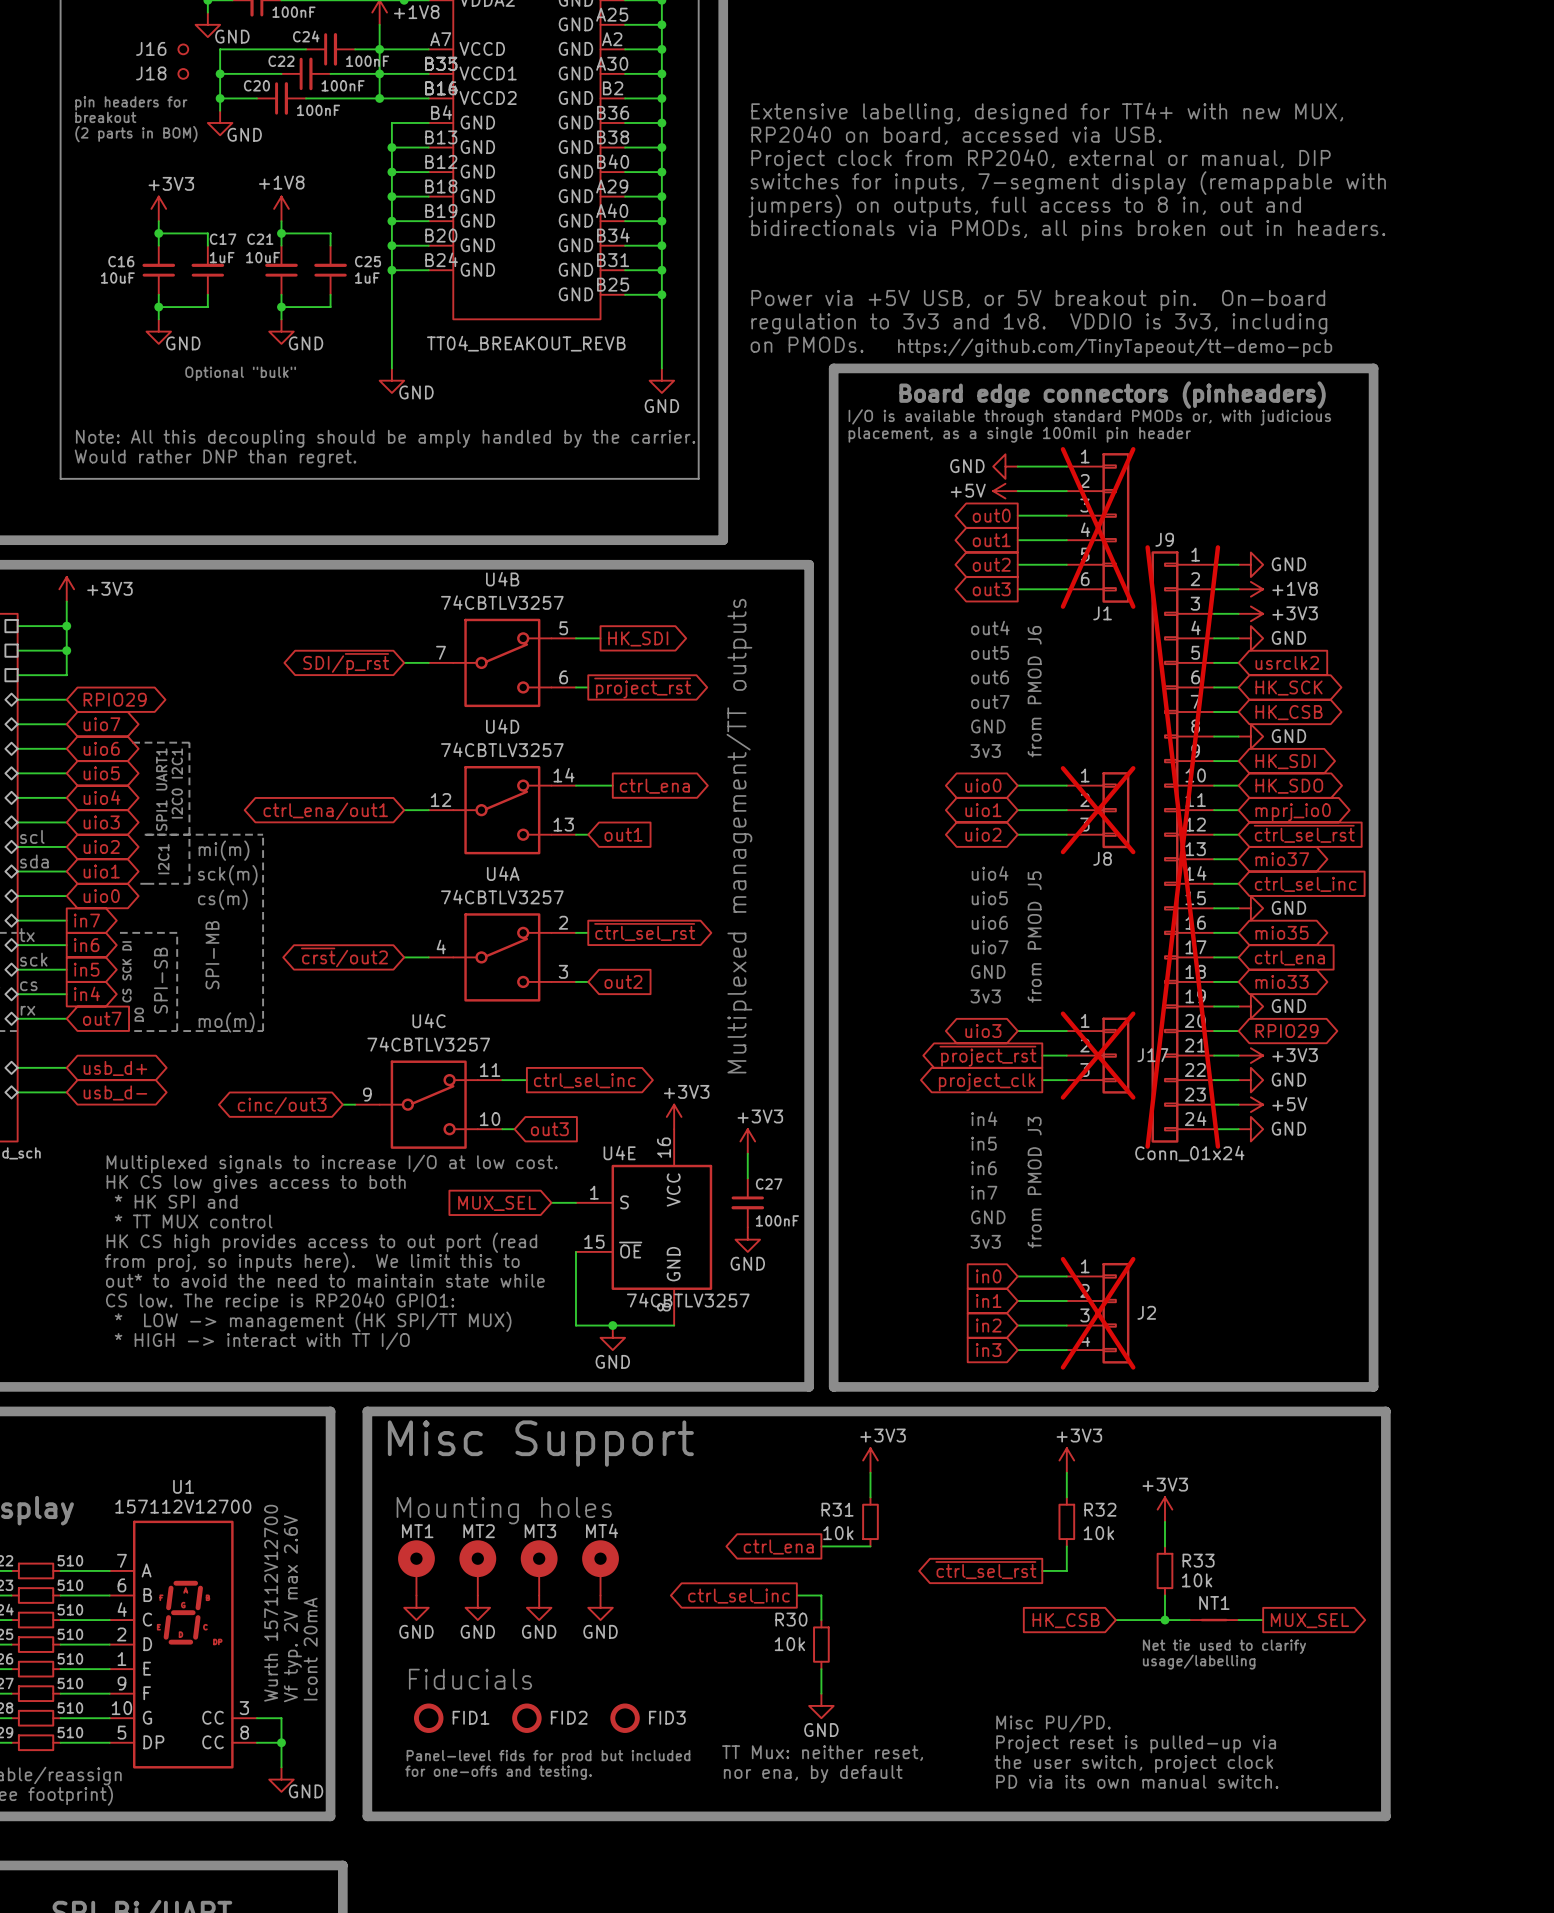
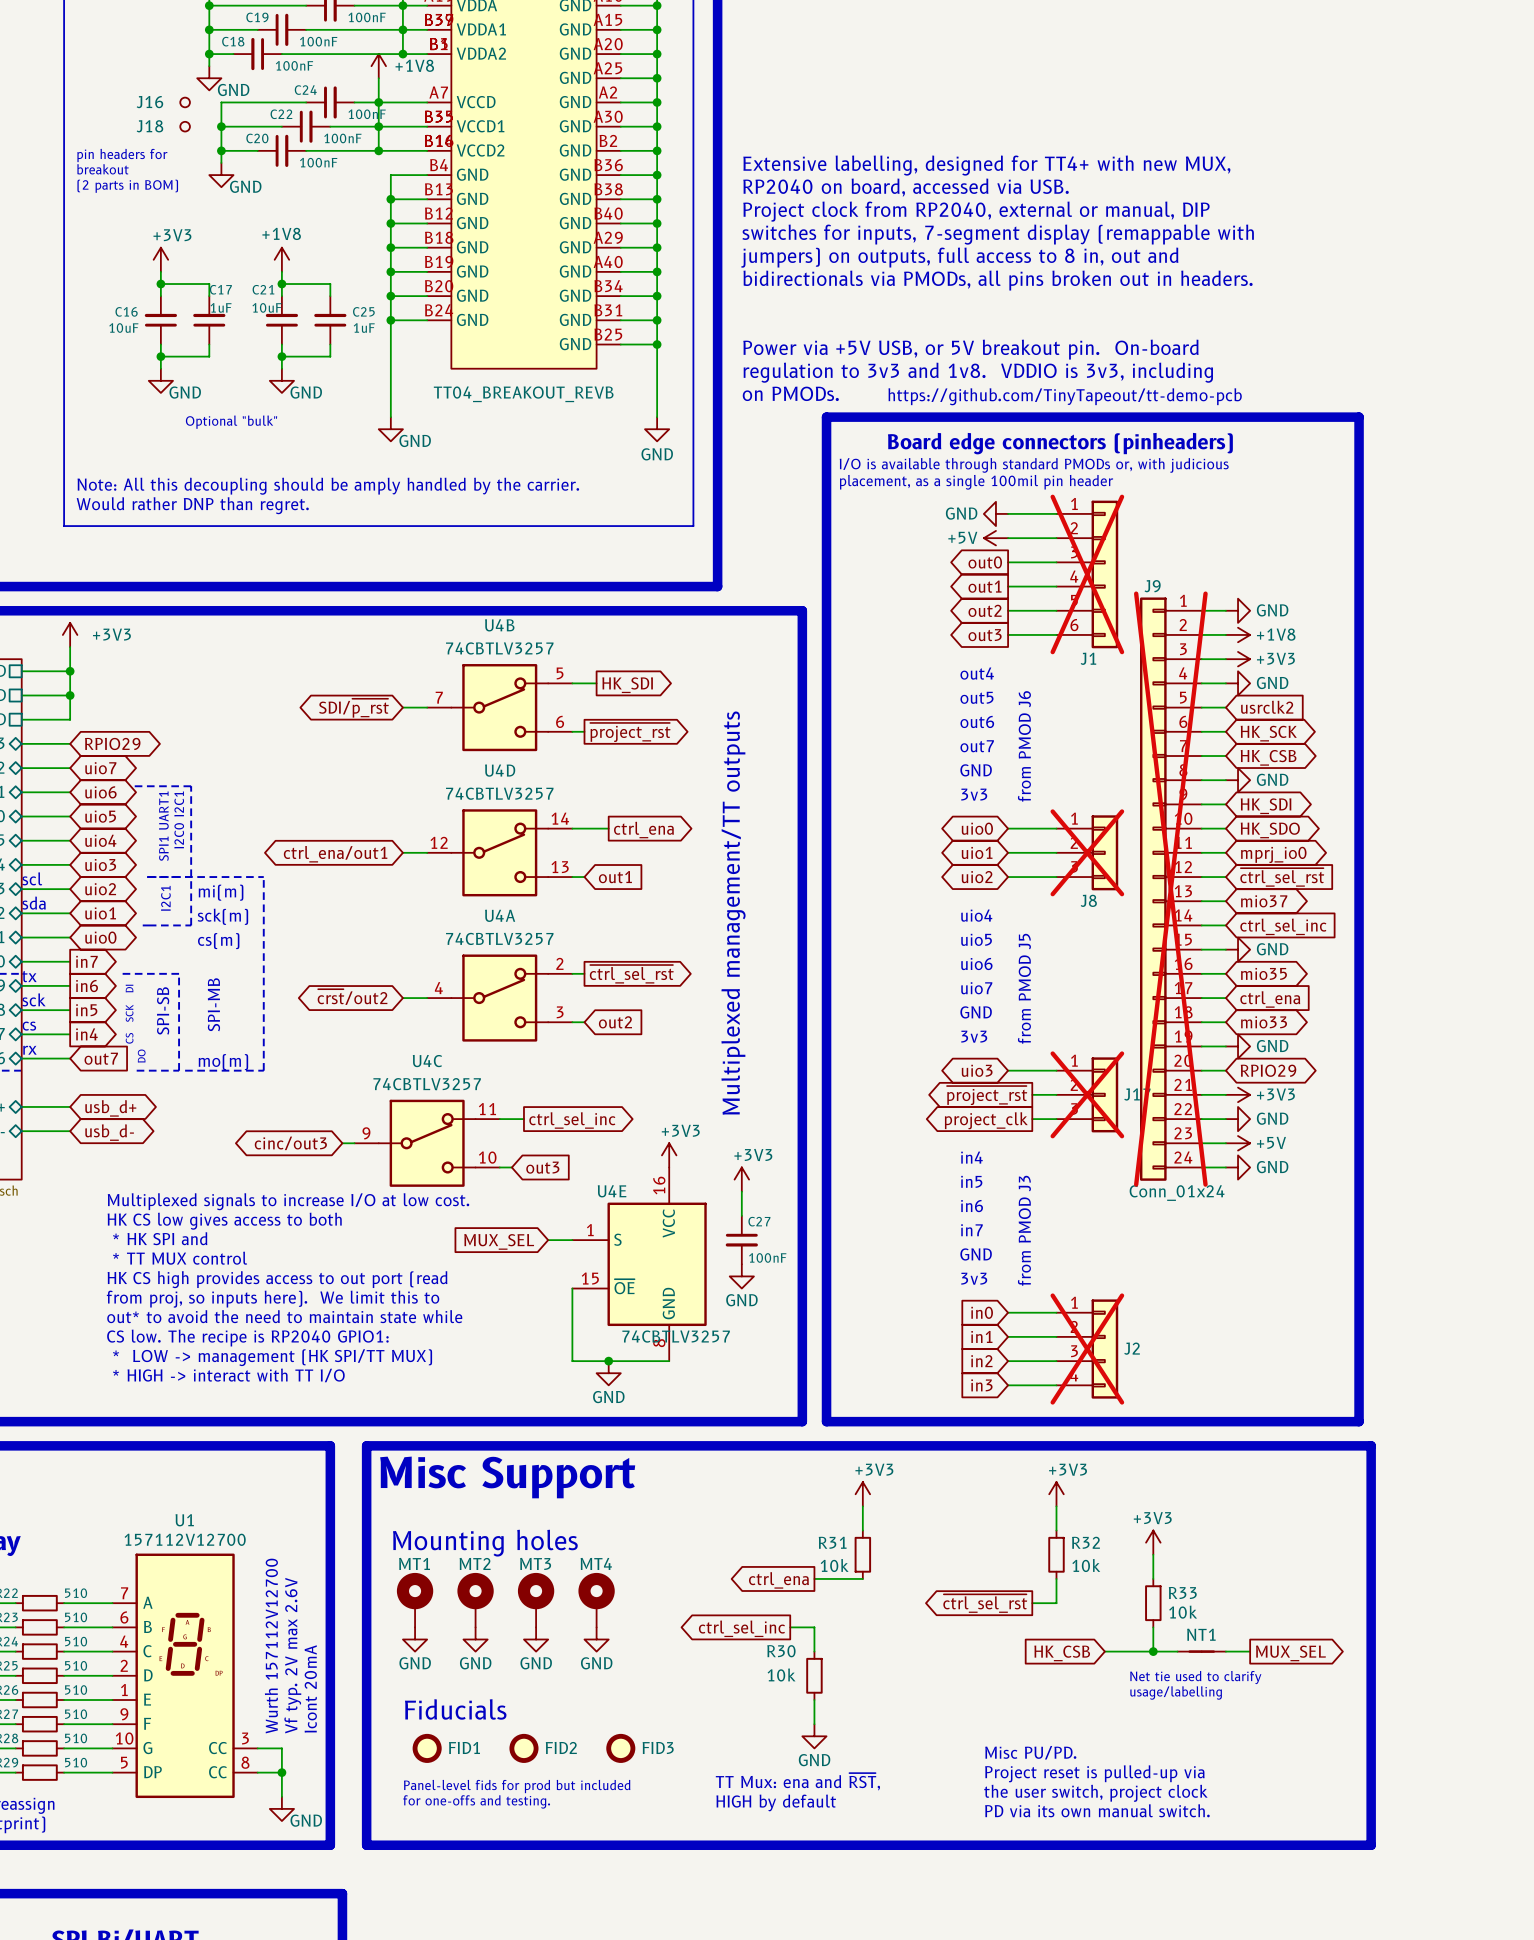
text: TT Mux: neither reset, (822, 1753) -> TT Mux: ena and ~{RST}, (797, 1781)
text: nor ena, by default (813, 1774) -> HIGH by default (776, 1802)

